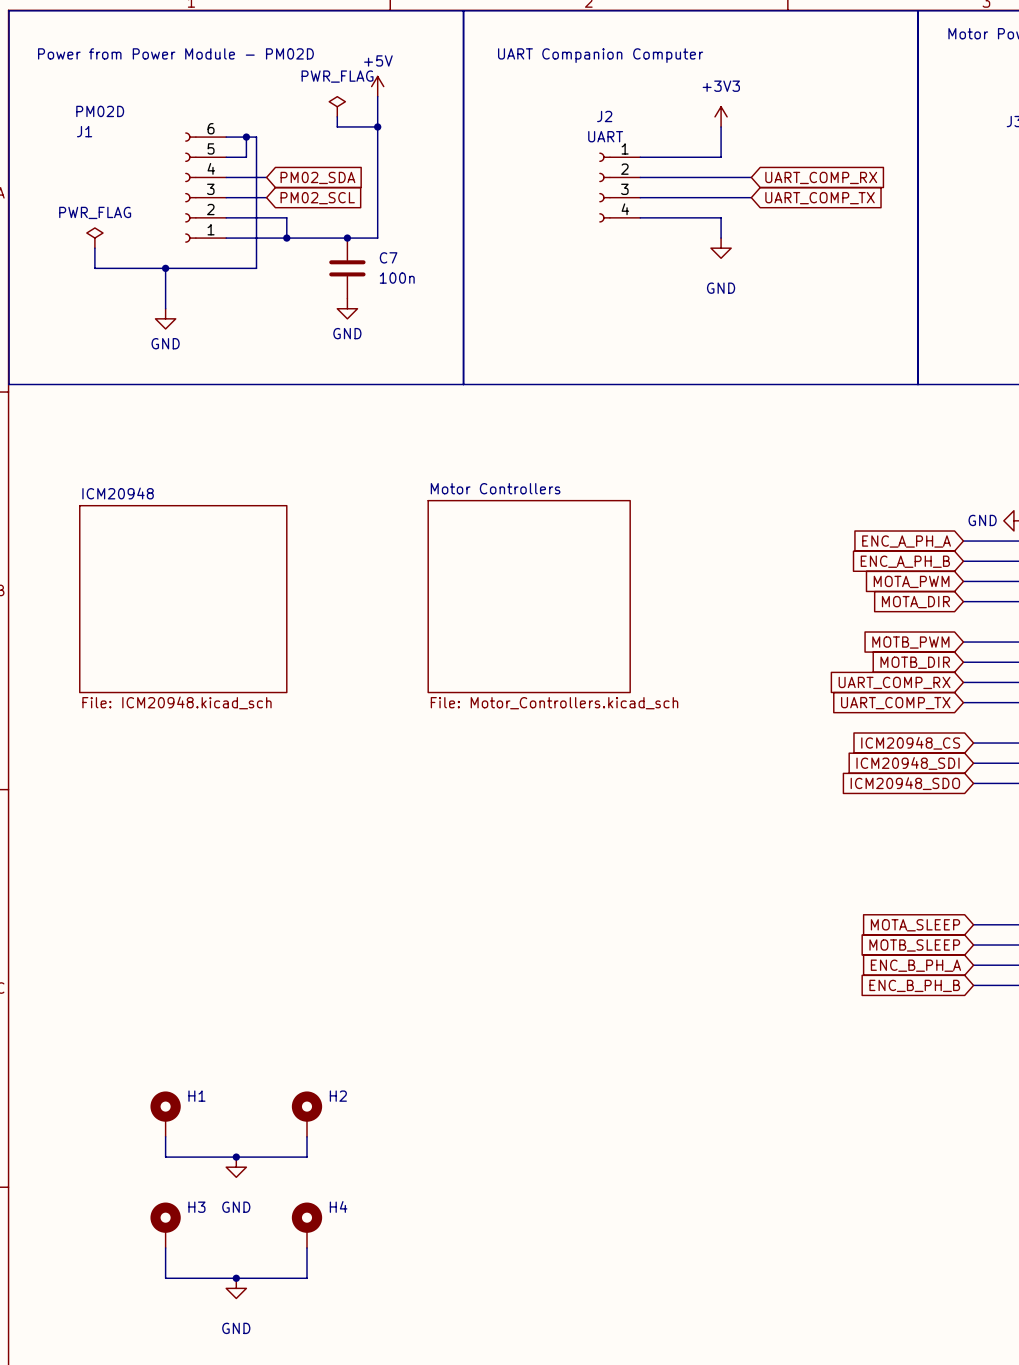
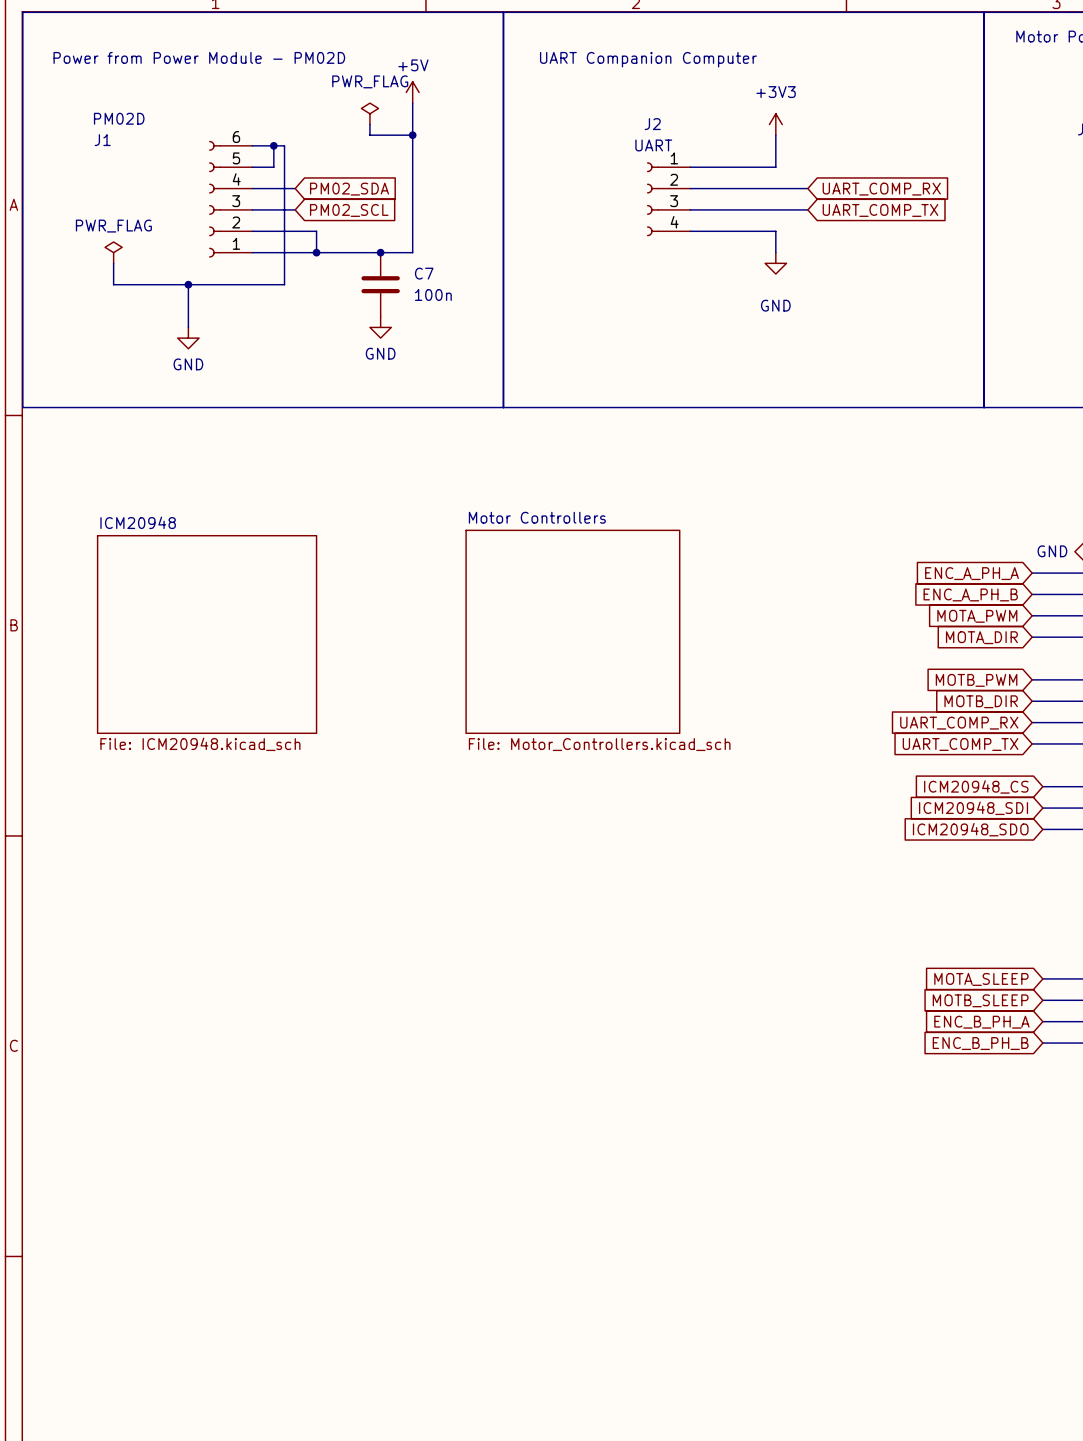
H1: (165, 1114) -> none
H2: (306, 1114) -> none
wire: (165, 1136) (165, 1157) (306, 1157) (306, 1136) -> none
junction: (236, 1157) -> none
power symbol: GND (236, 1167) -> none
H3: (165, 1225) -> none
H4: (306, 1225) -> none
wire: (165, 1247) (165, 1278) (306, 1278) (306, 1247) -> none
junction: (236, 1278) -> none
power symbol: GND (236, 1288) -> none

